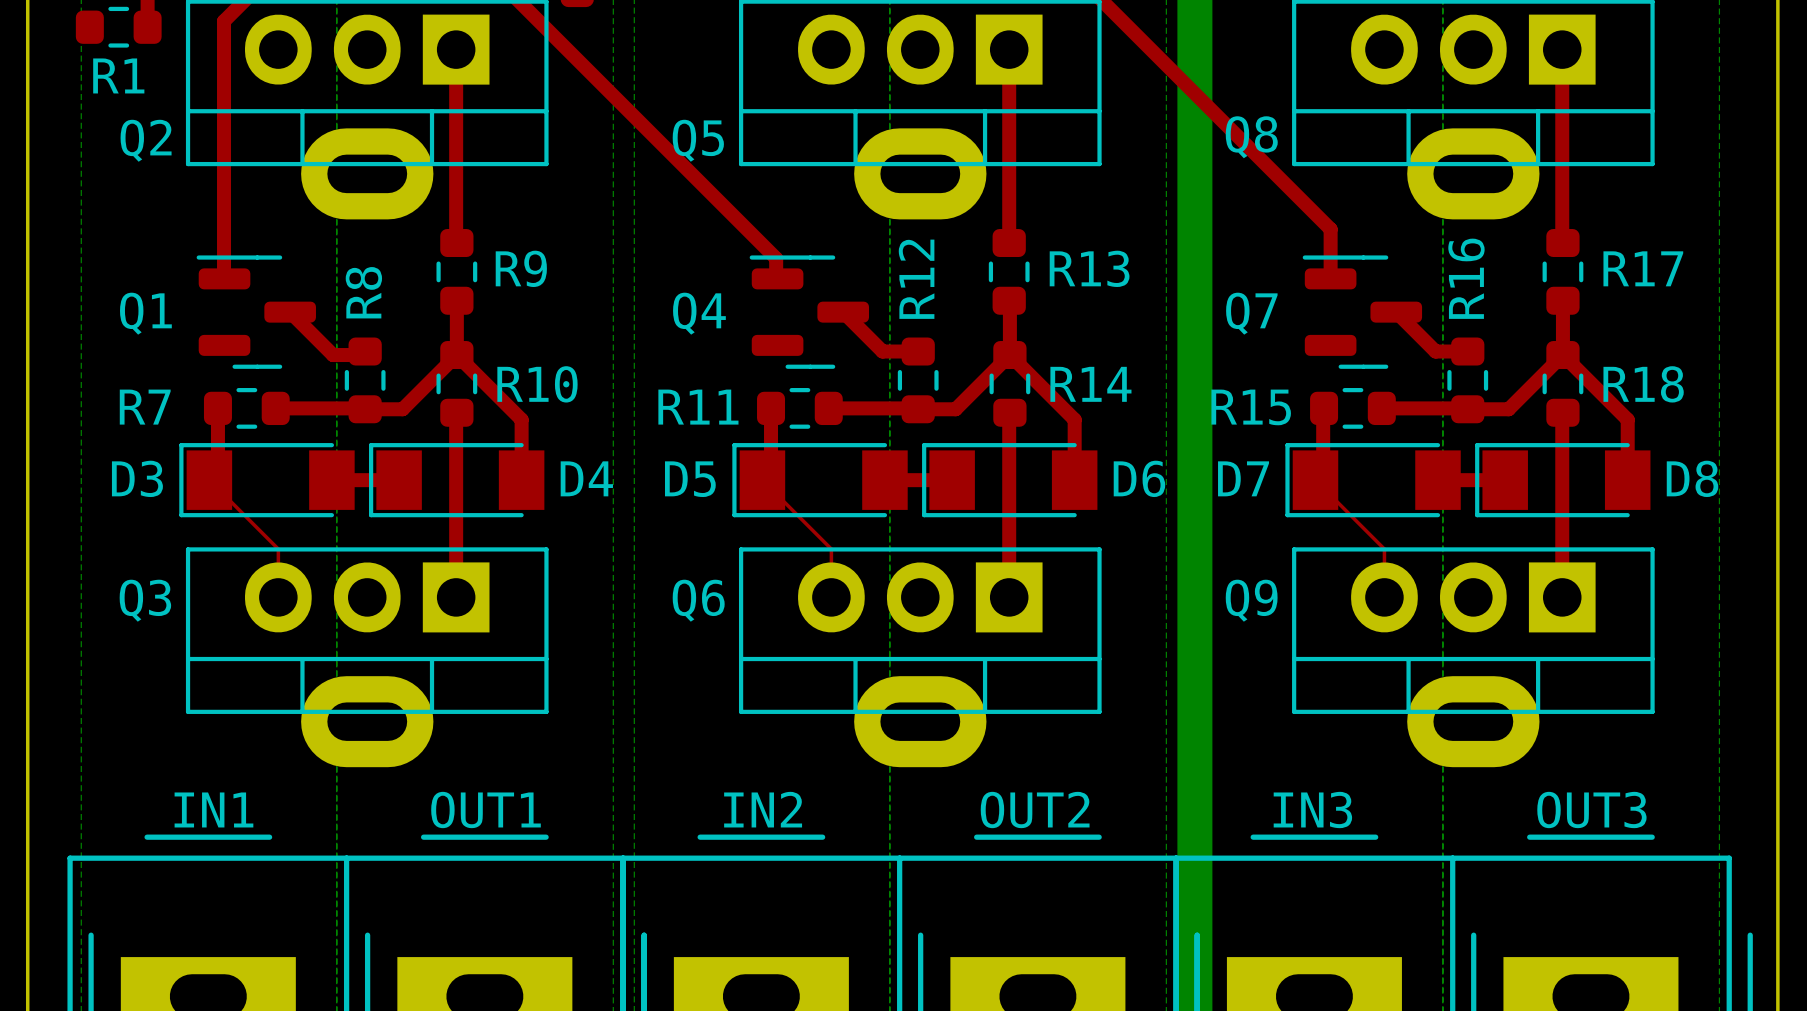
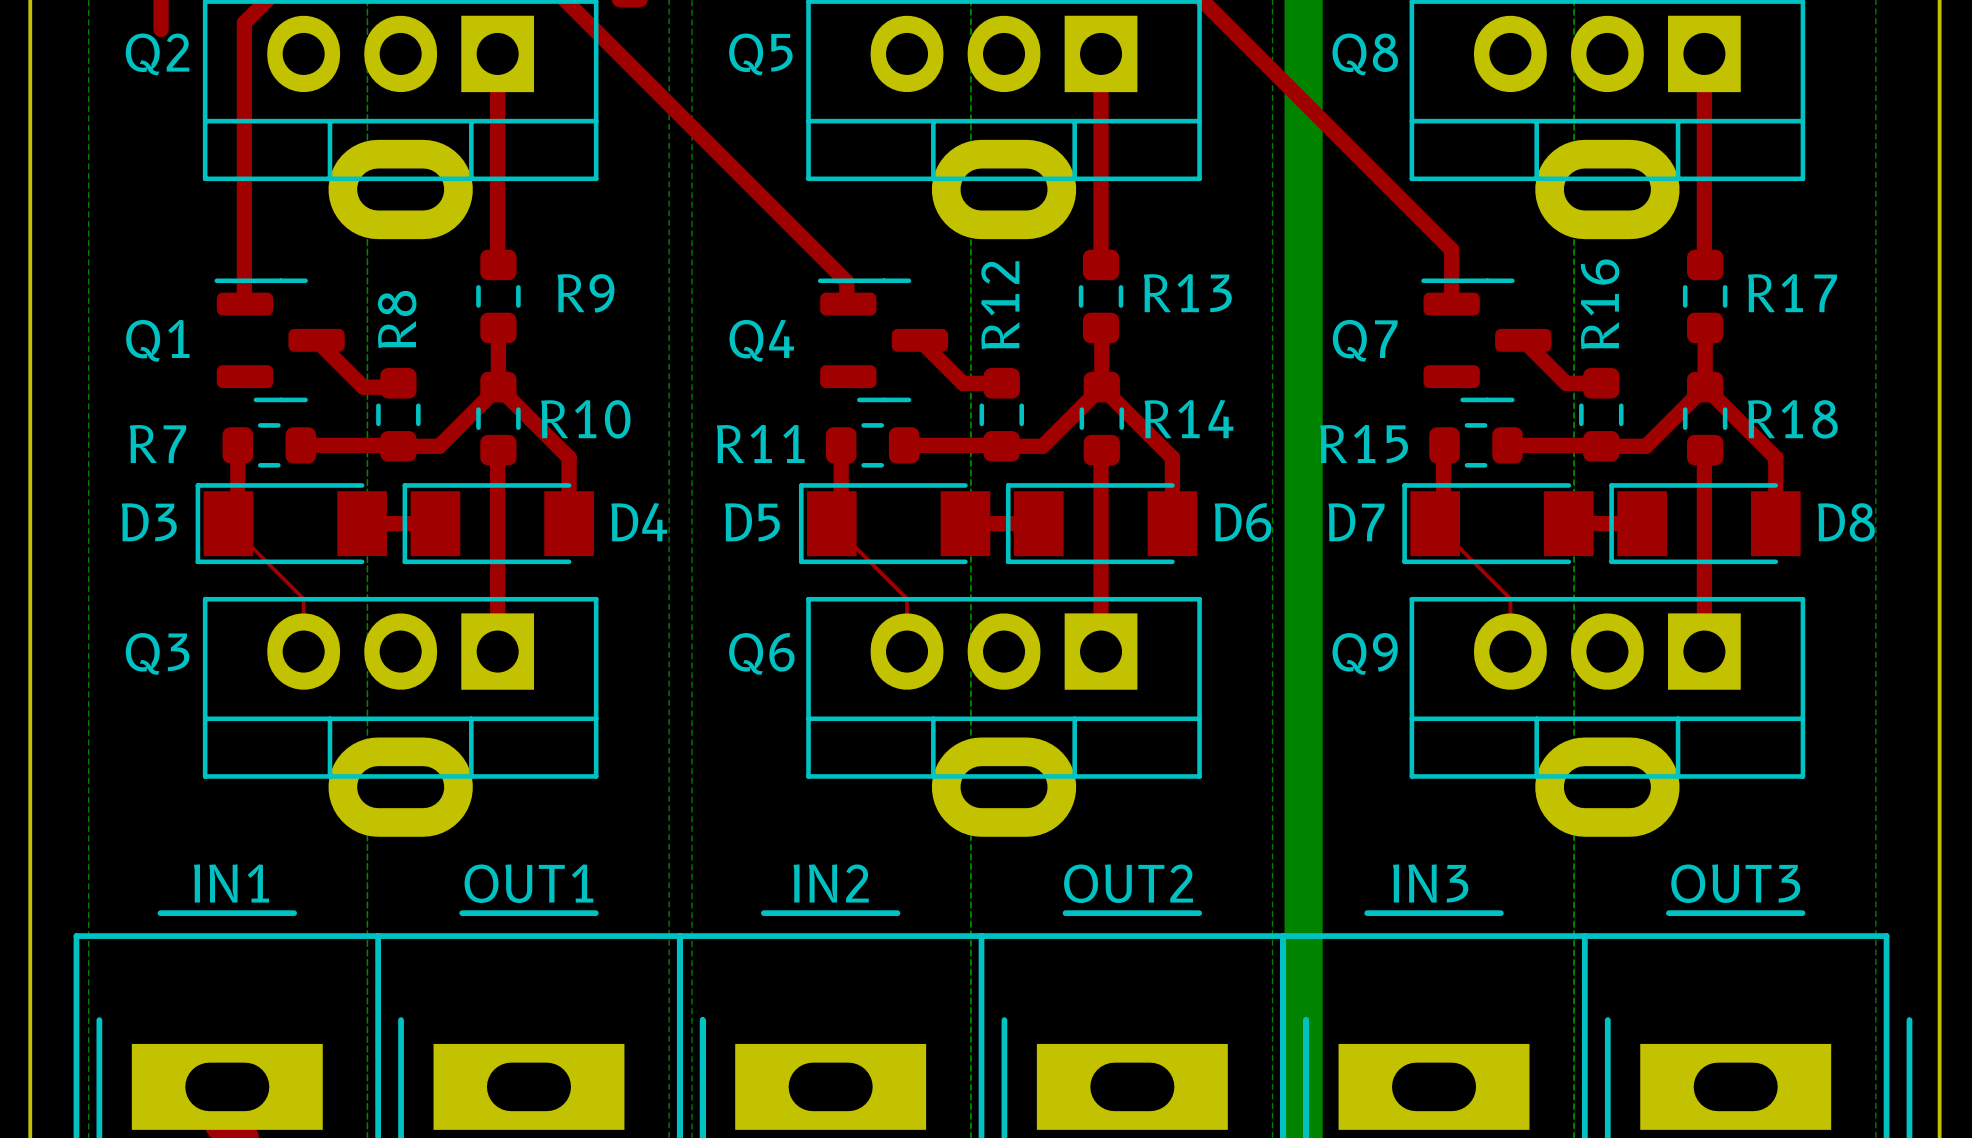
R1: (118, 27) -> none
Q8 name position: Q8 (1251, 137) -> Q8 (1365, 54)
Q2 name position: Q2 (146, 140) -> Q2 (157, 54)
Q5 name position: Q5 (698, 140) -> Q5 (760, 54)
R9 name position: R9 (521, 268) -> R9 (585, 293)

